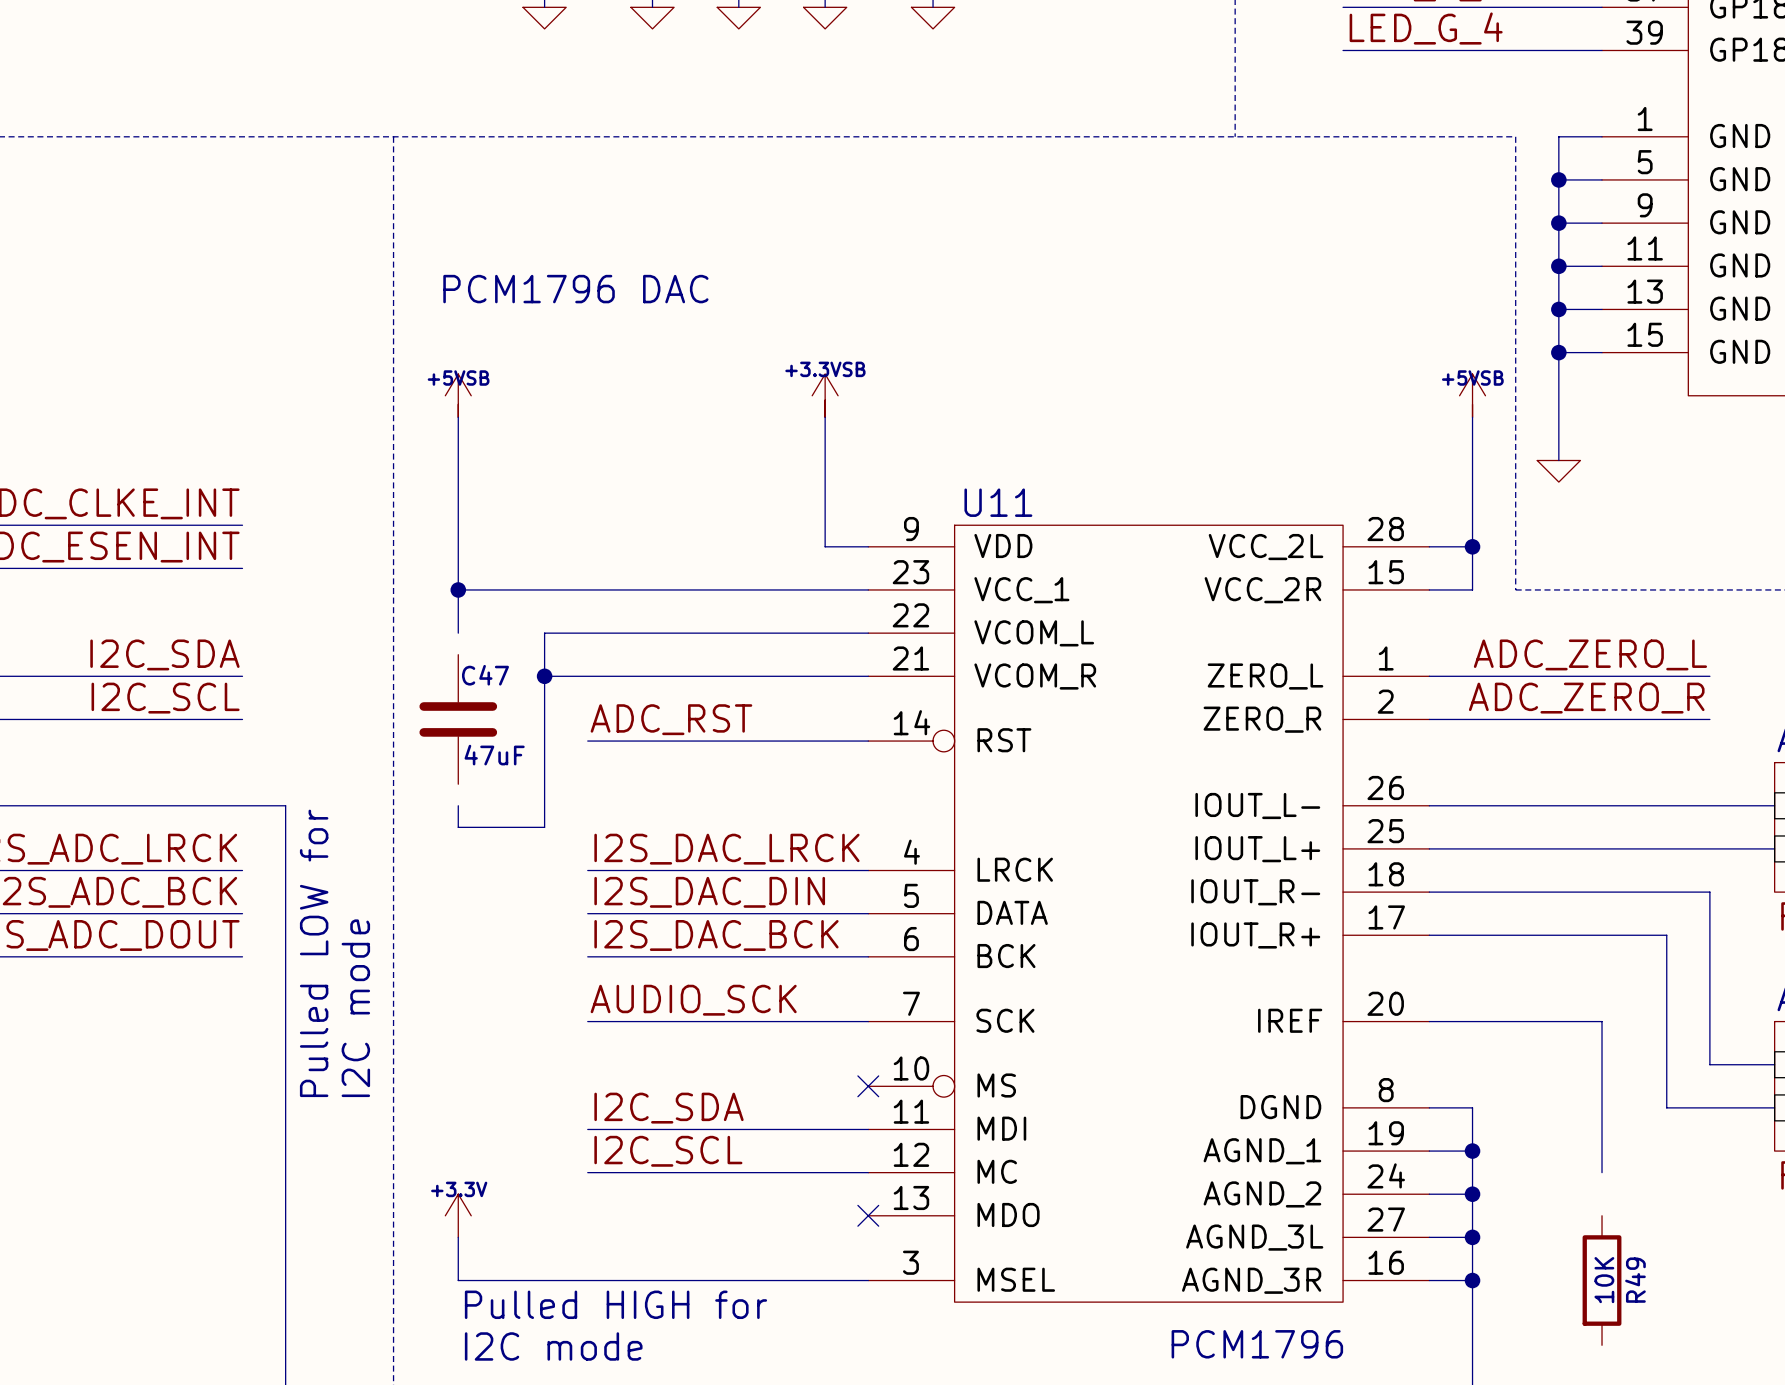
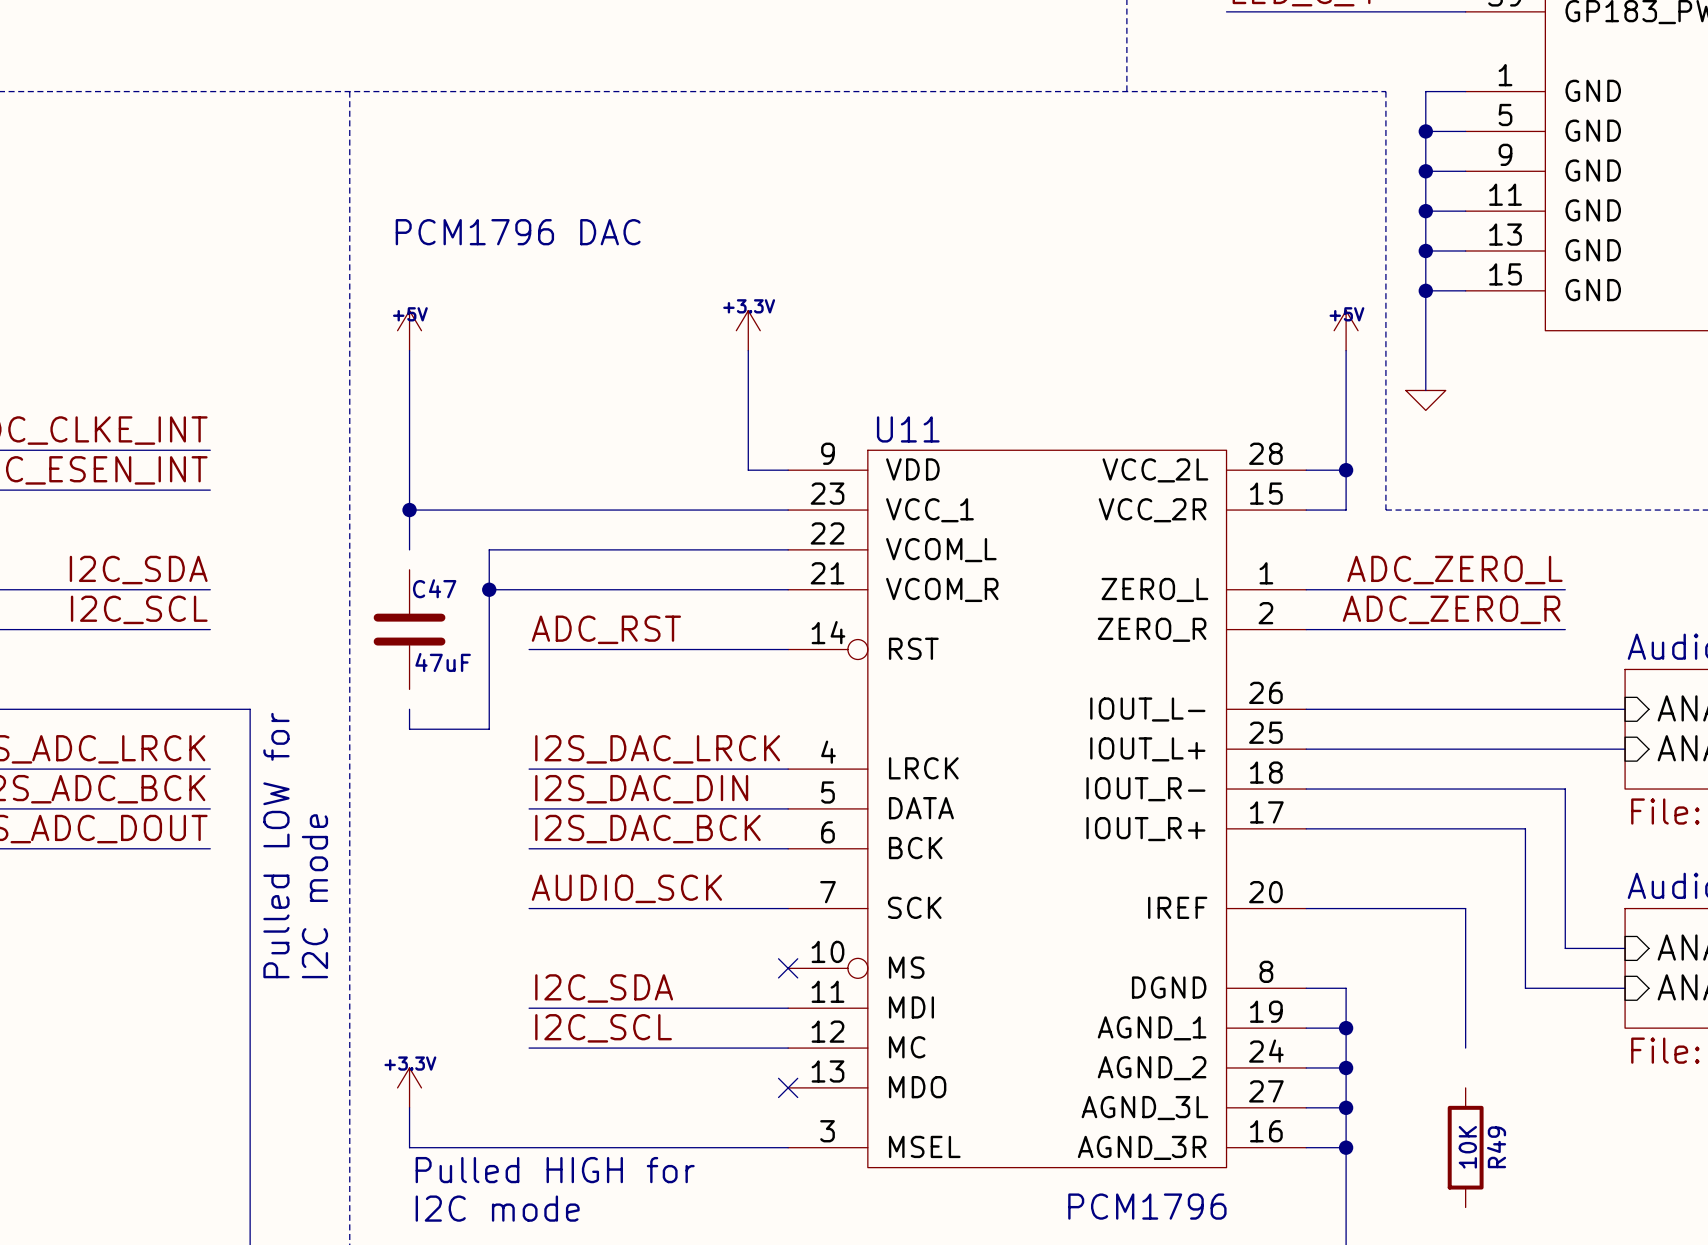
power symbol: +5VSB (458, 395) -> +5V (409, 330)
power symbol: +3.3VSB (825, 395) -> +3.3V (748, 330)
power symbol: +5VSB (1472, 395) -> +5V (1346, 330)

